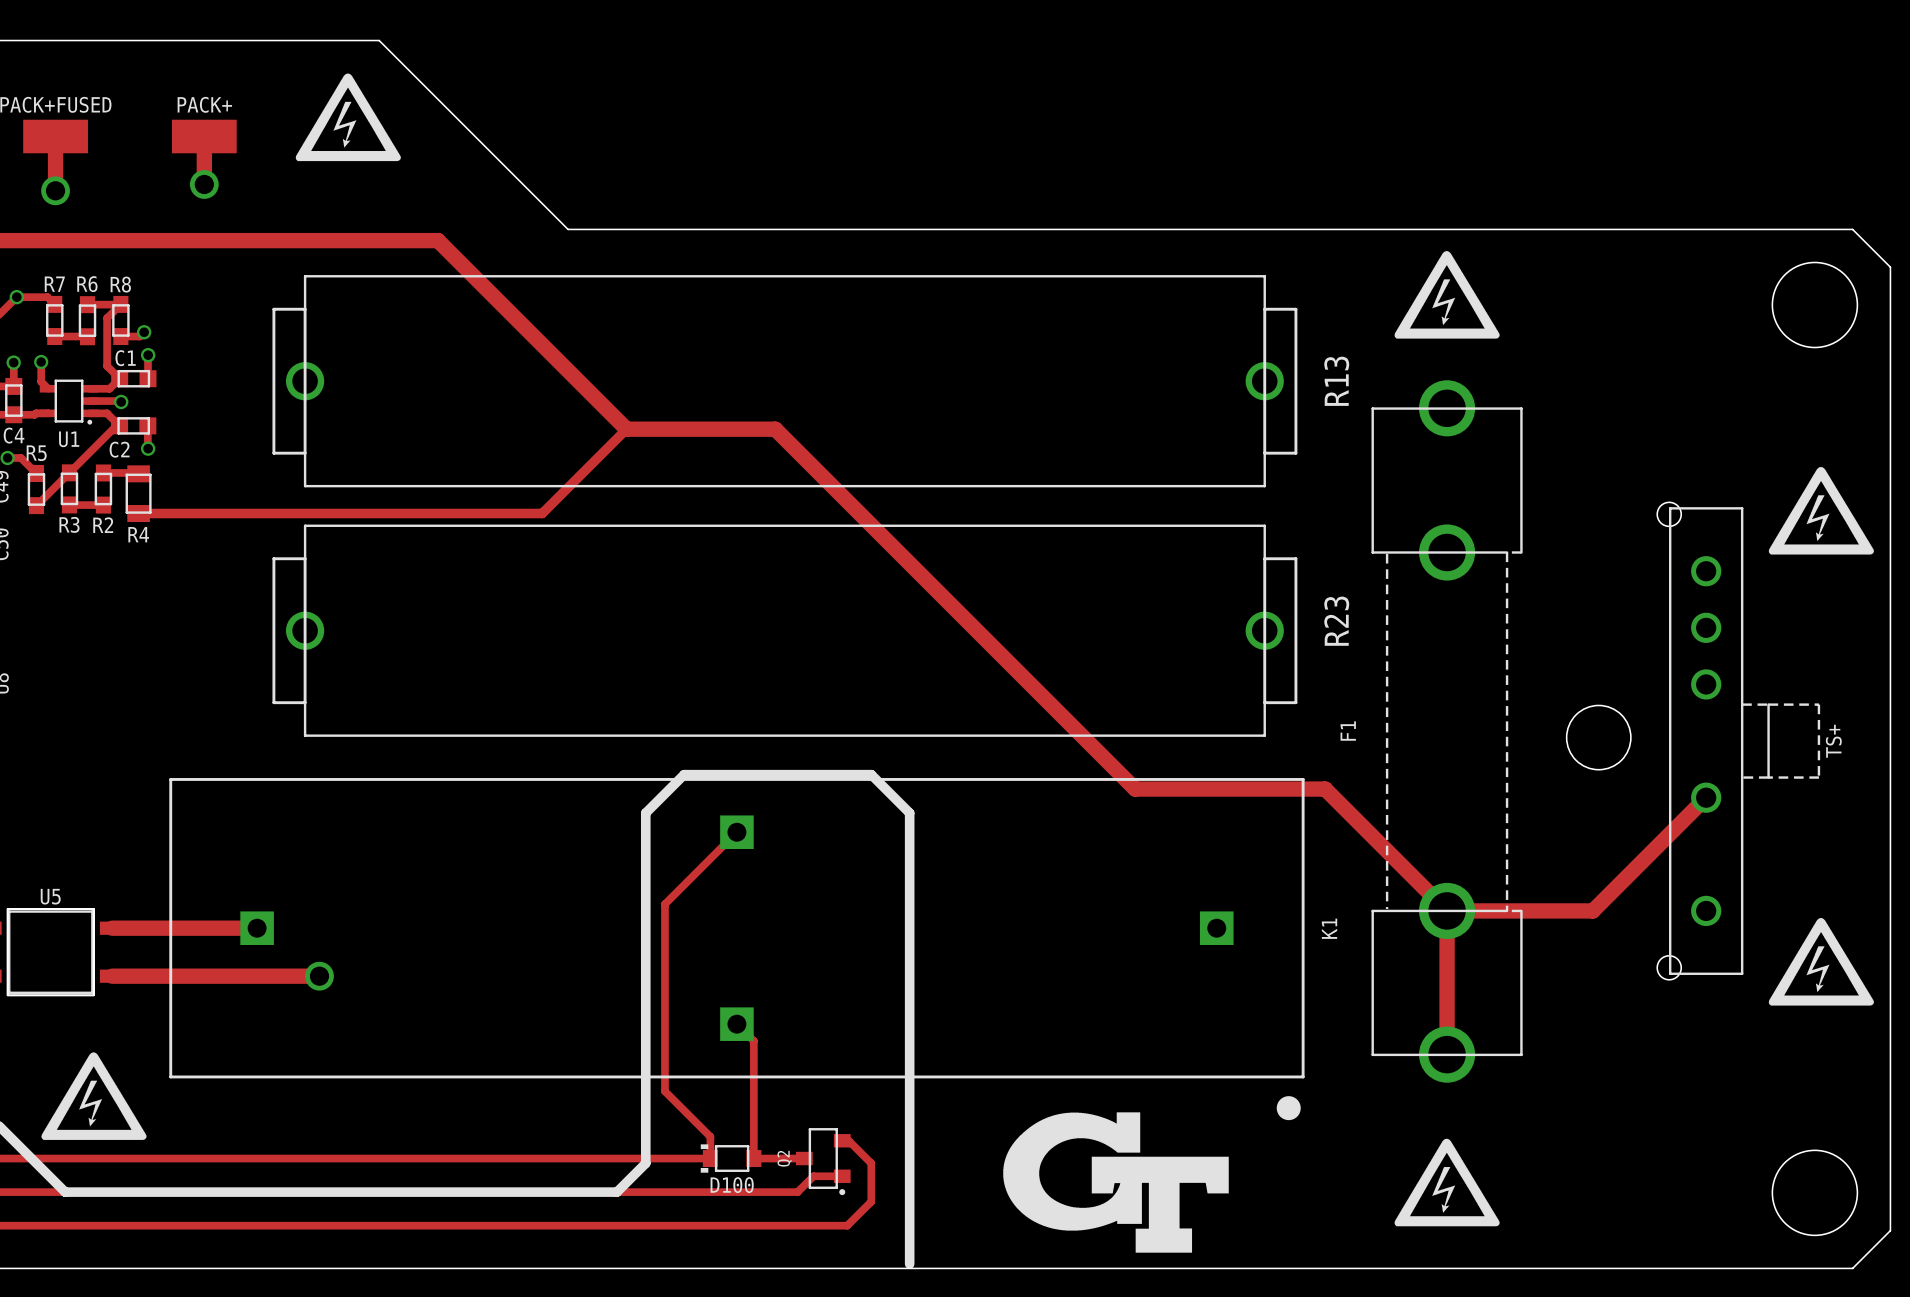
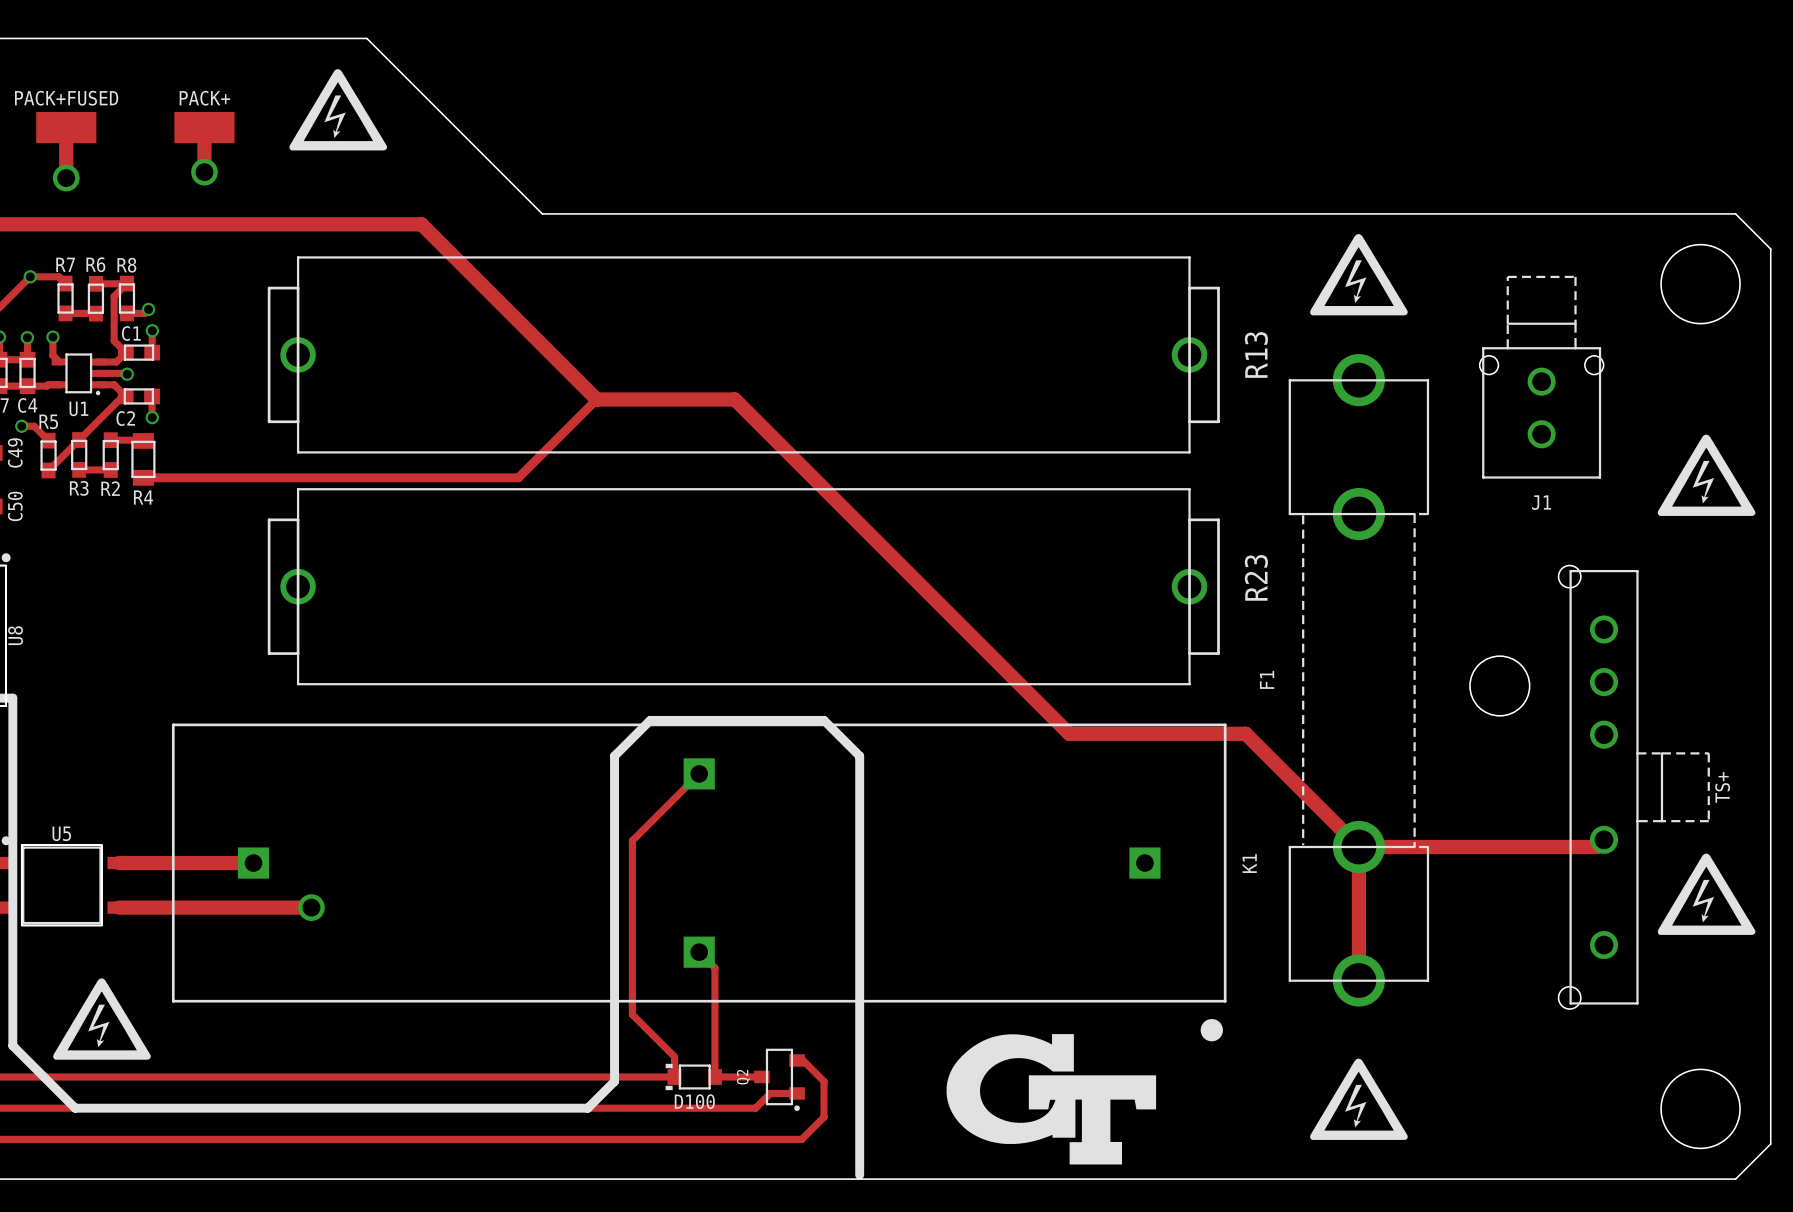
J1: none -> (1541, 377)
TS+ position: (1738, 741) -> (1634, 787)
track: (1706, 797) (1592, 910) -> (1604, 839) (1596, 847) (1494, 847)

